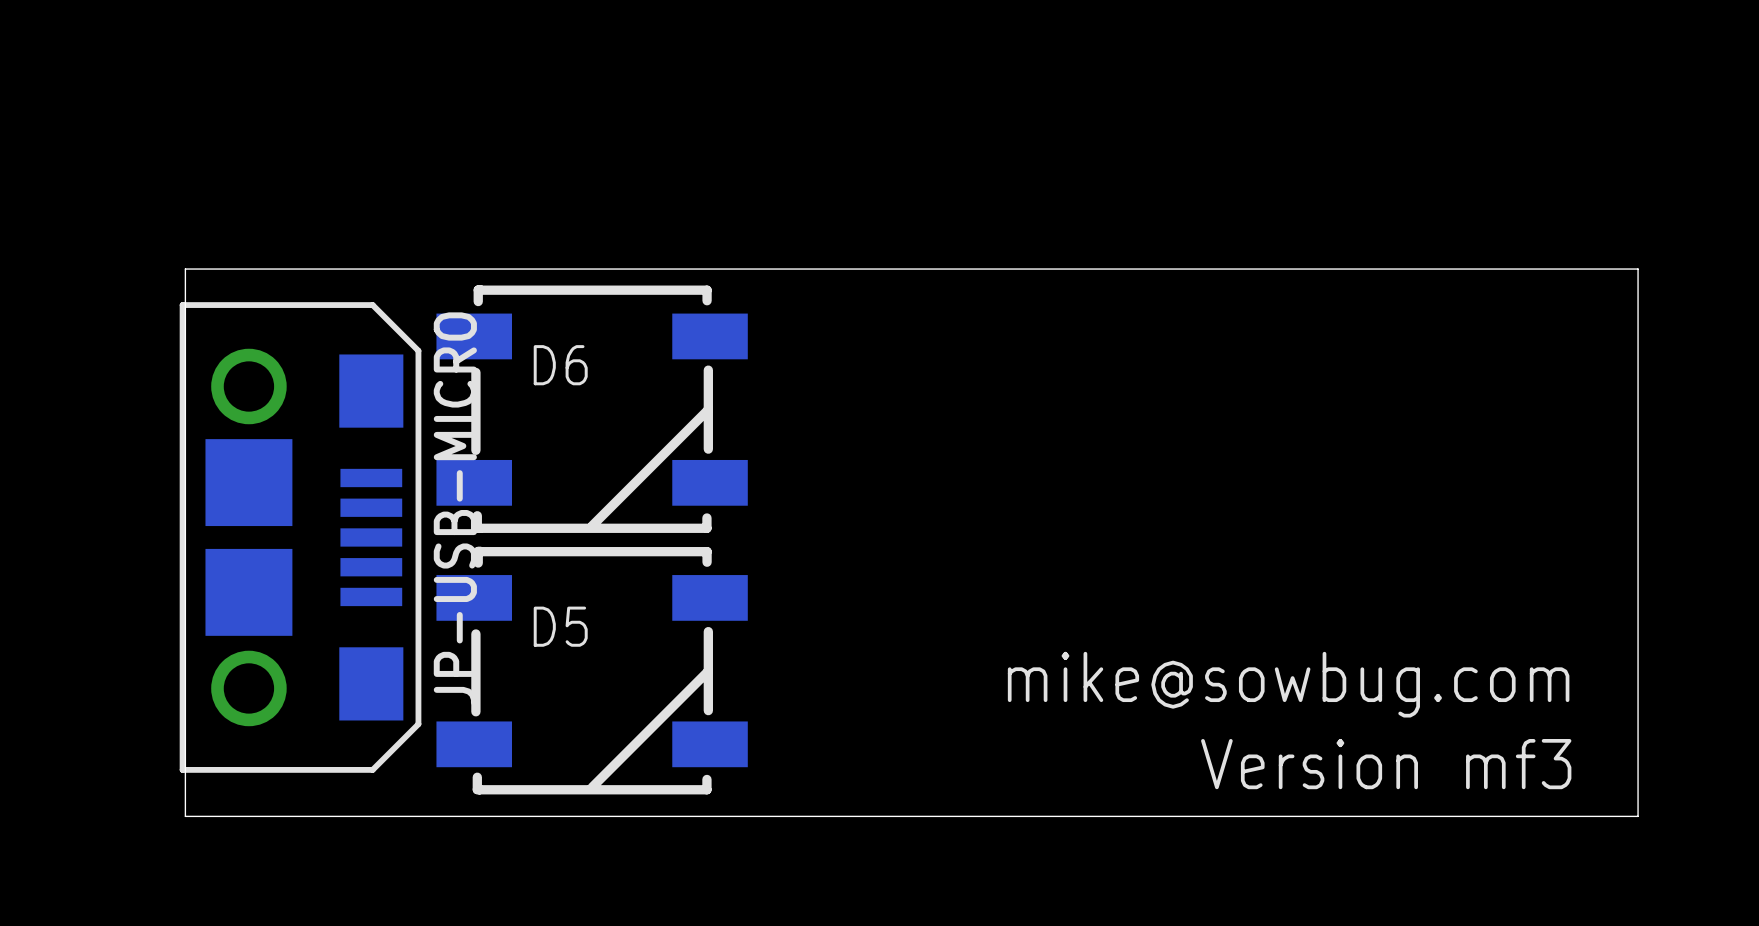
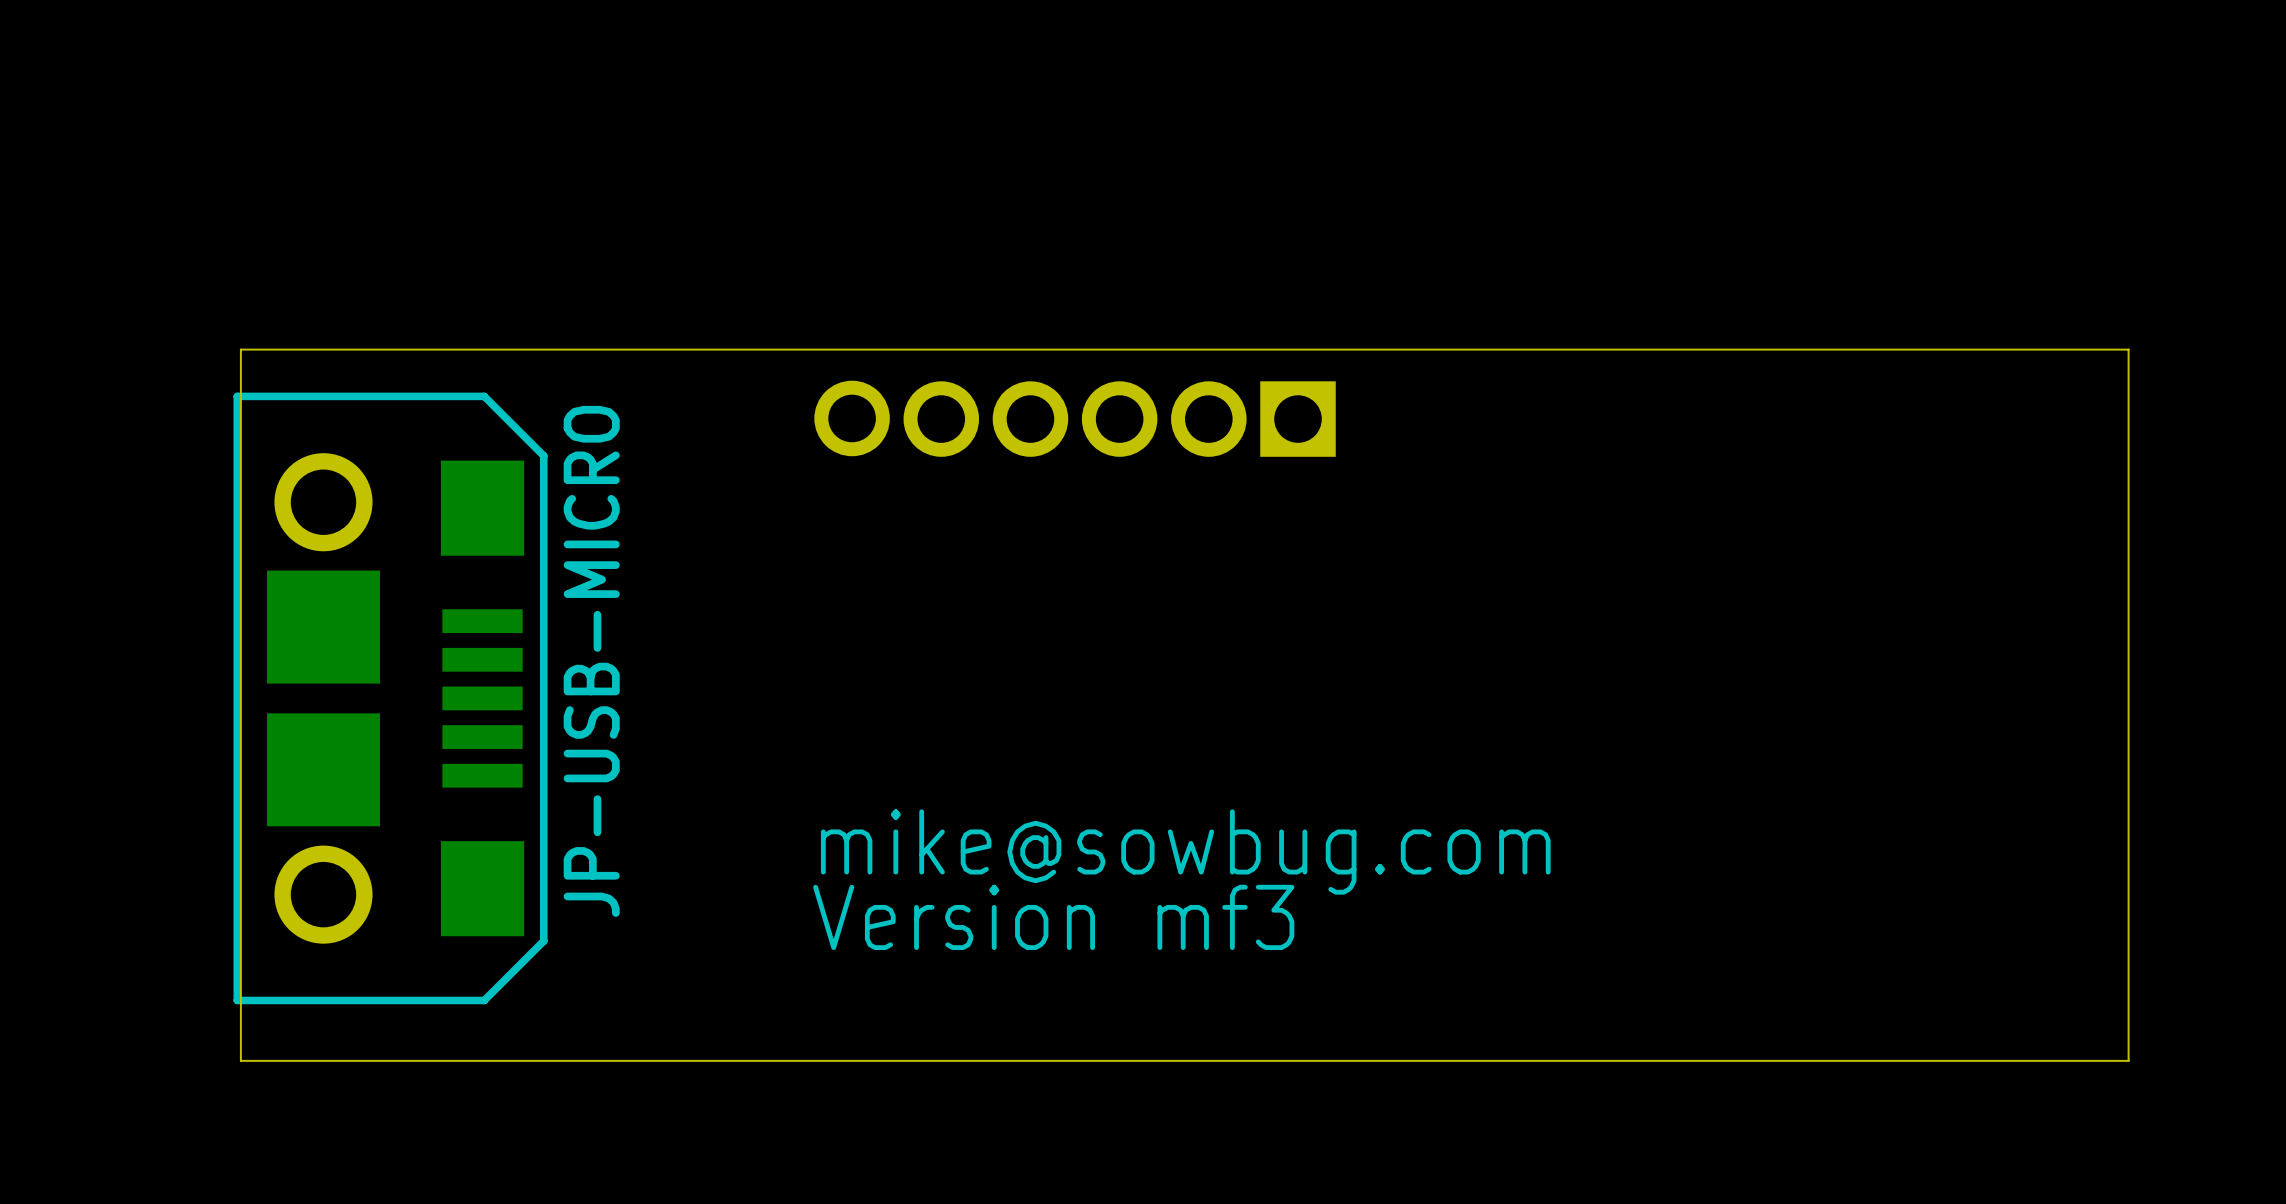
part: none -> (1075, 418)
D6: (592, 409) -> none
D5: (592, 670) -> none
text position: mike@sowbug.com (1288, 684) -> mike@sowbug.com (1185, 851)
text position: Version mf3 (1386, 764) -> Version mf3 (1053, 917)

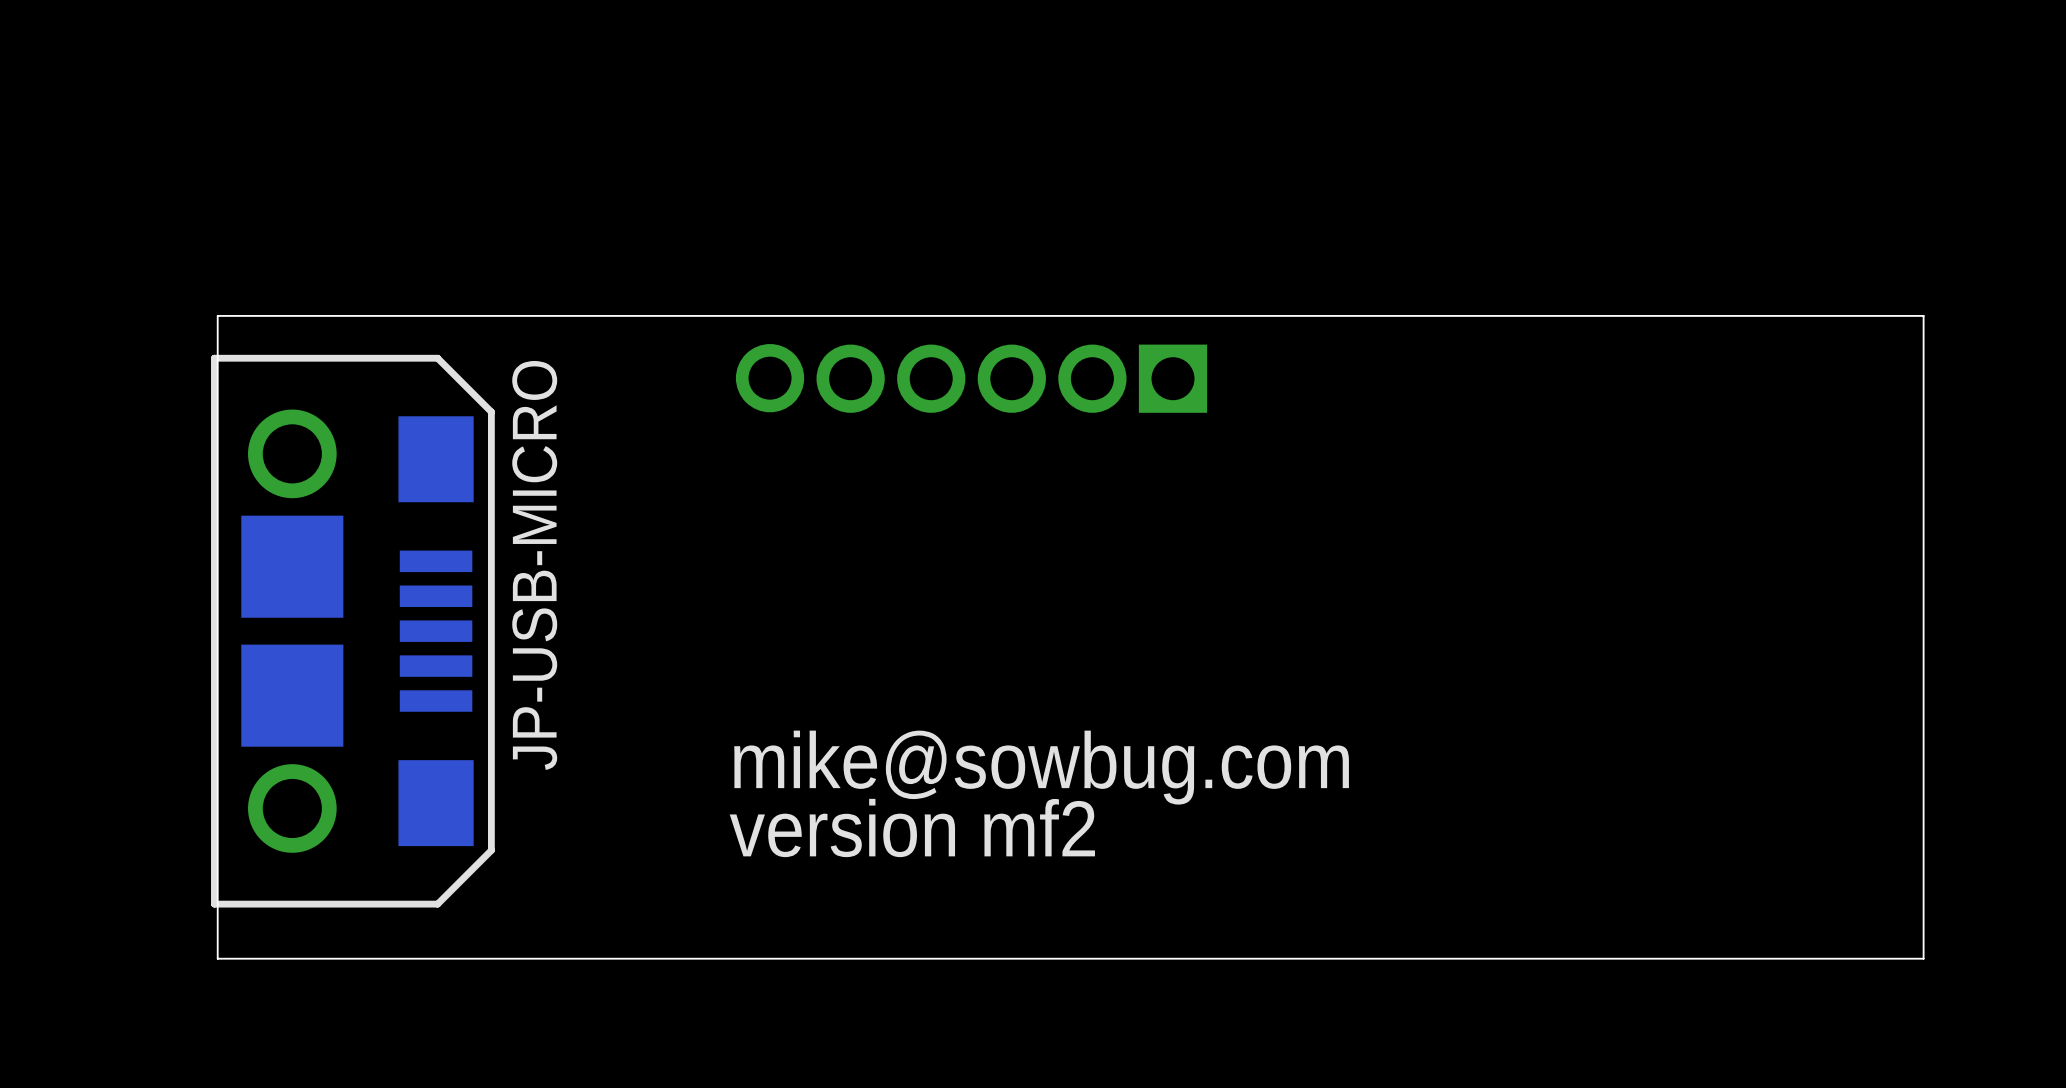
text: Version mf3 (1053, 917) -> version mf2 (912, 827)

